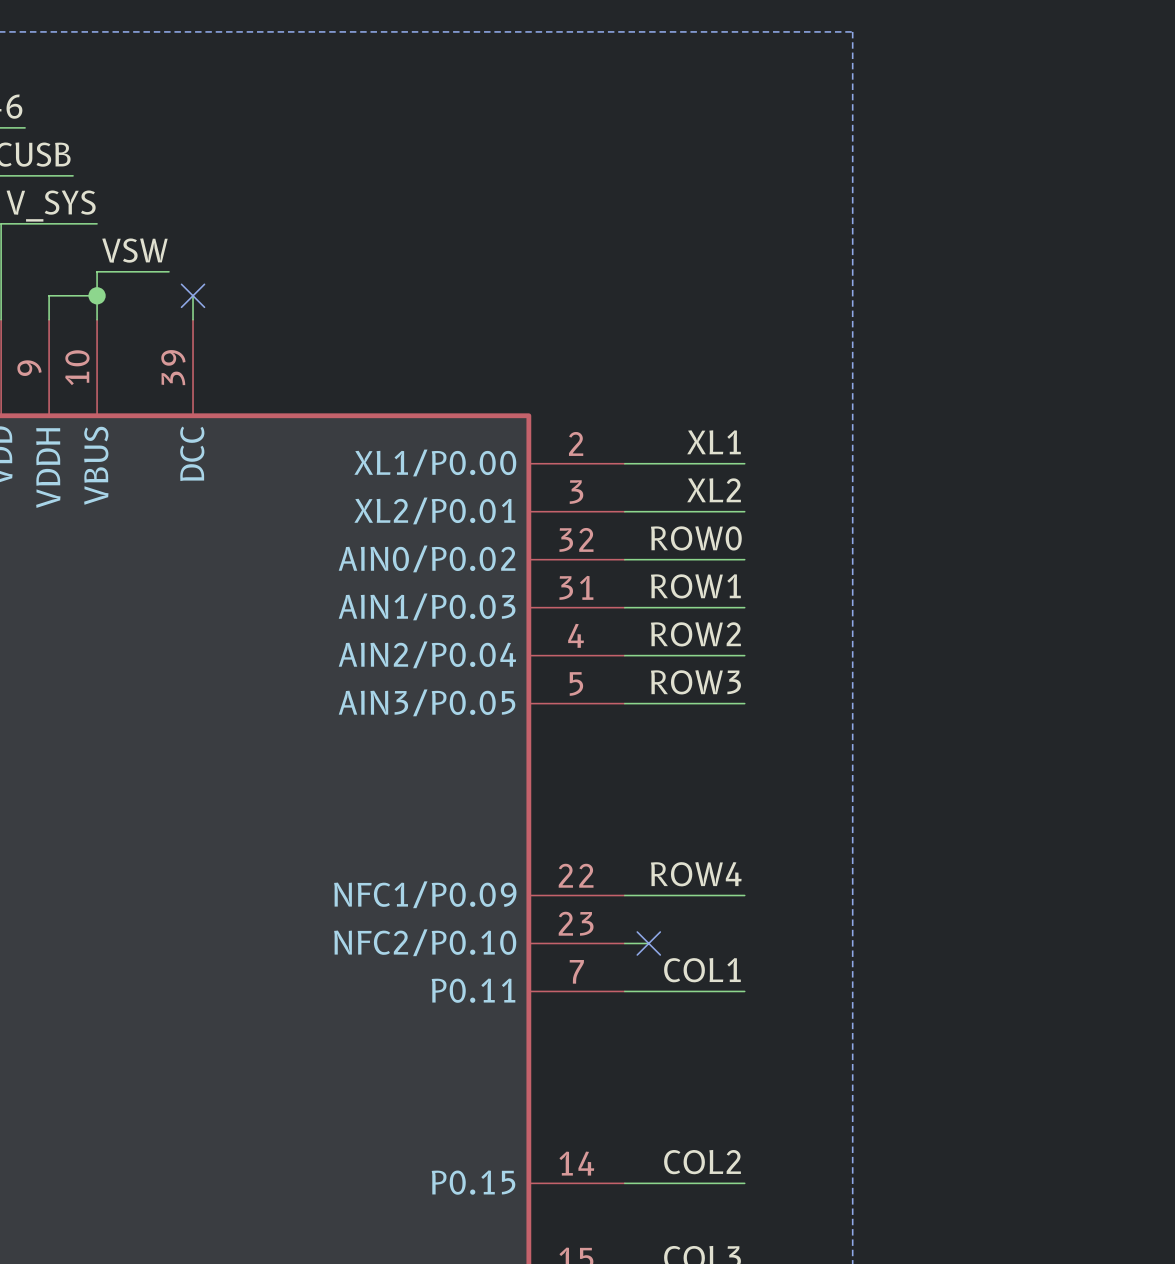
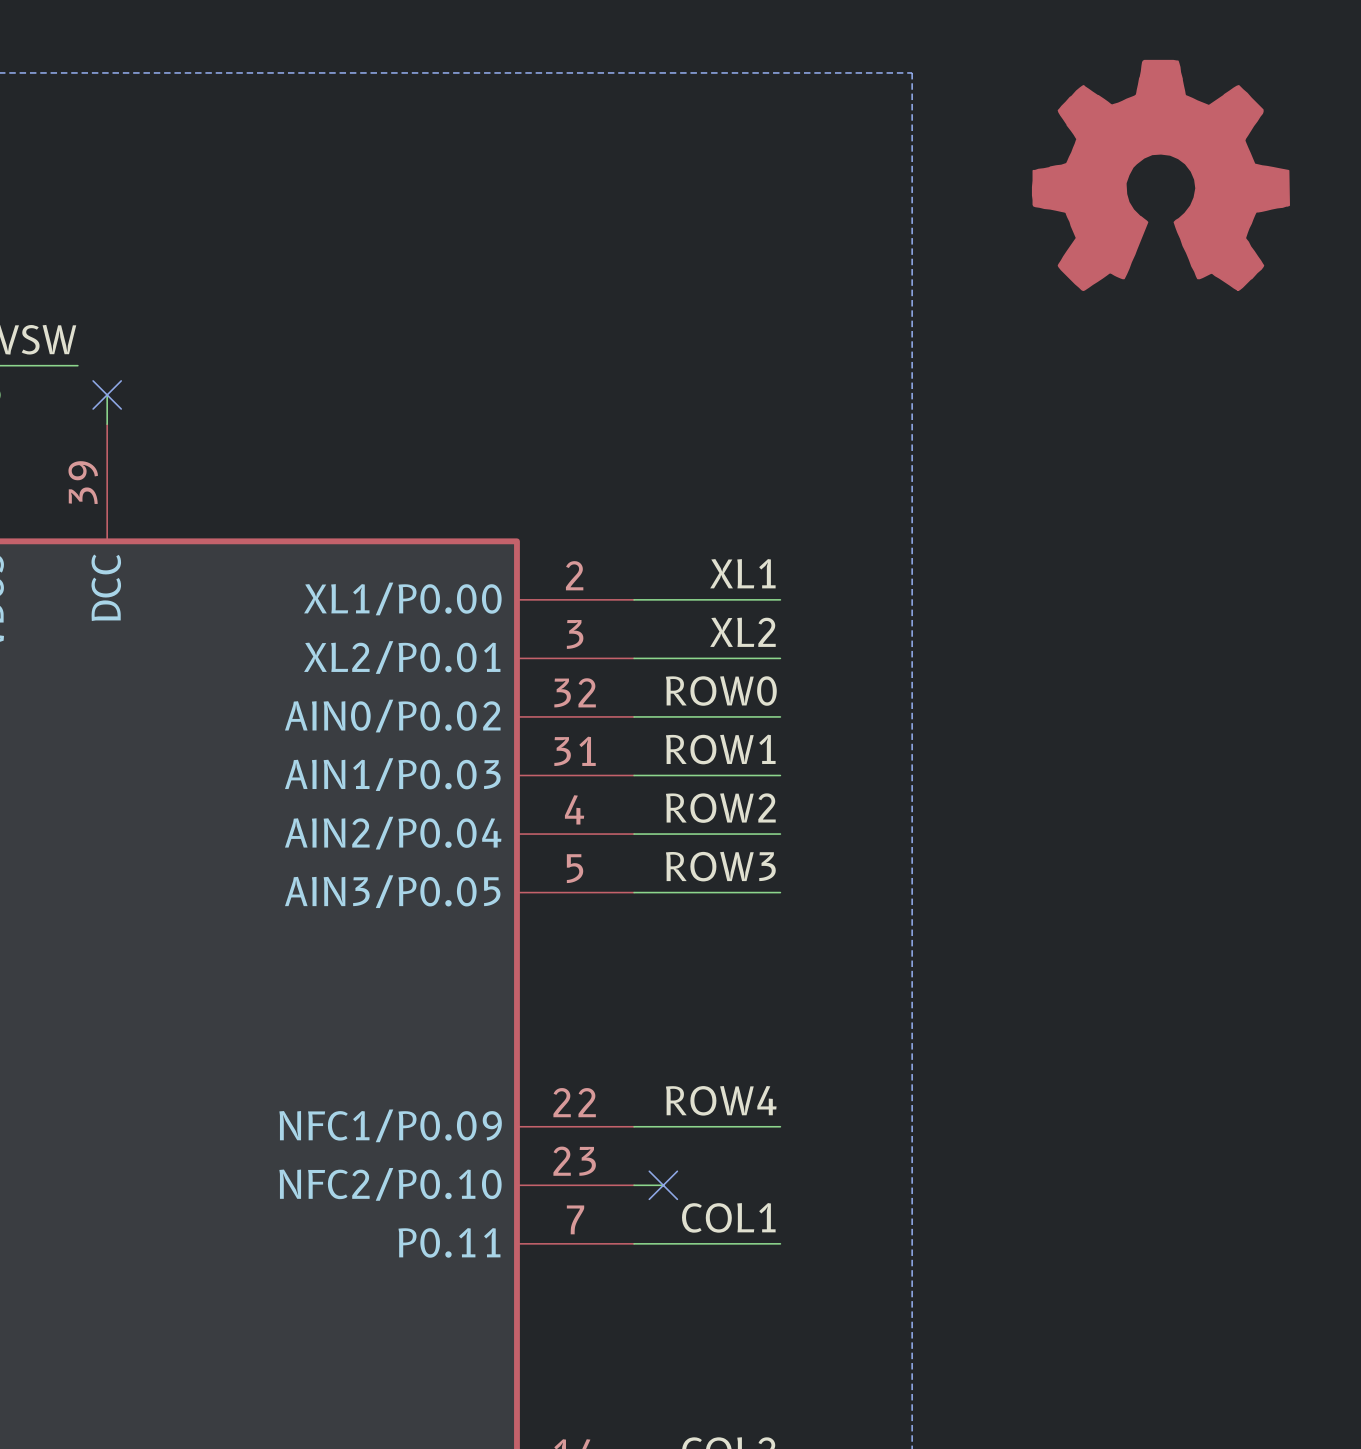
part: none -> (1160, 175)

